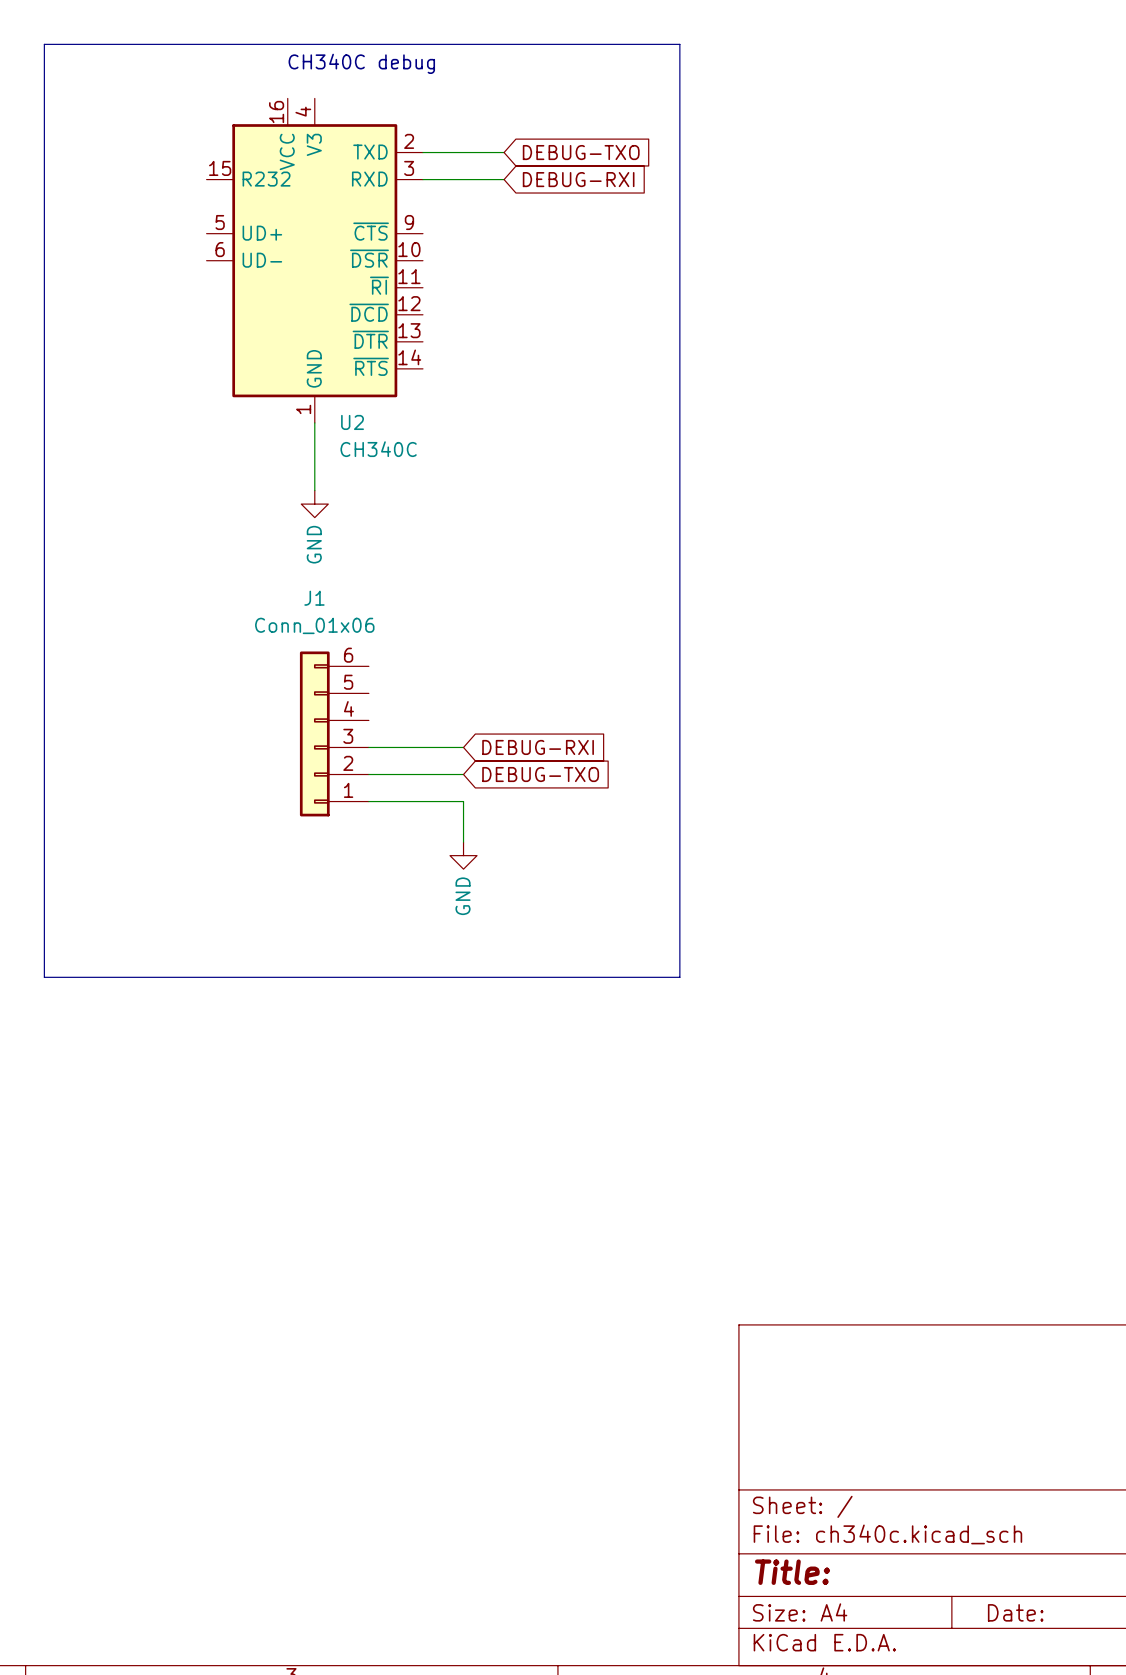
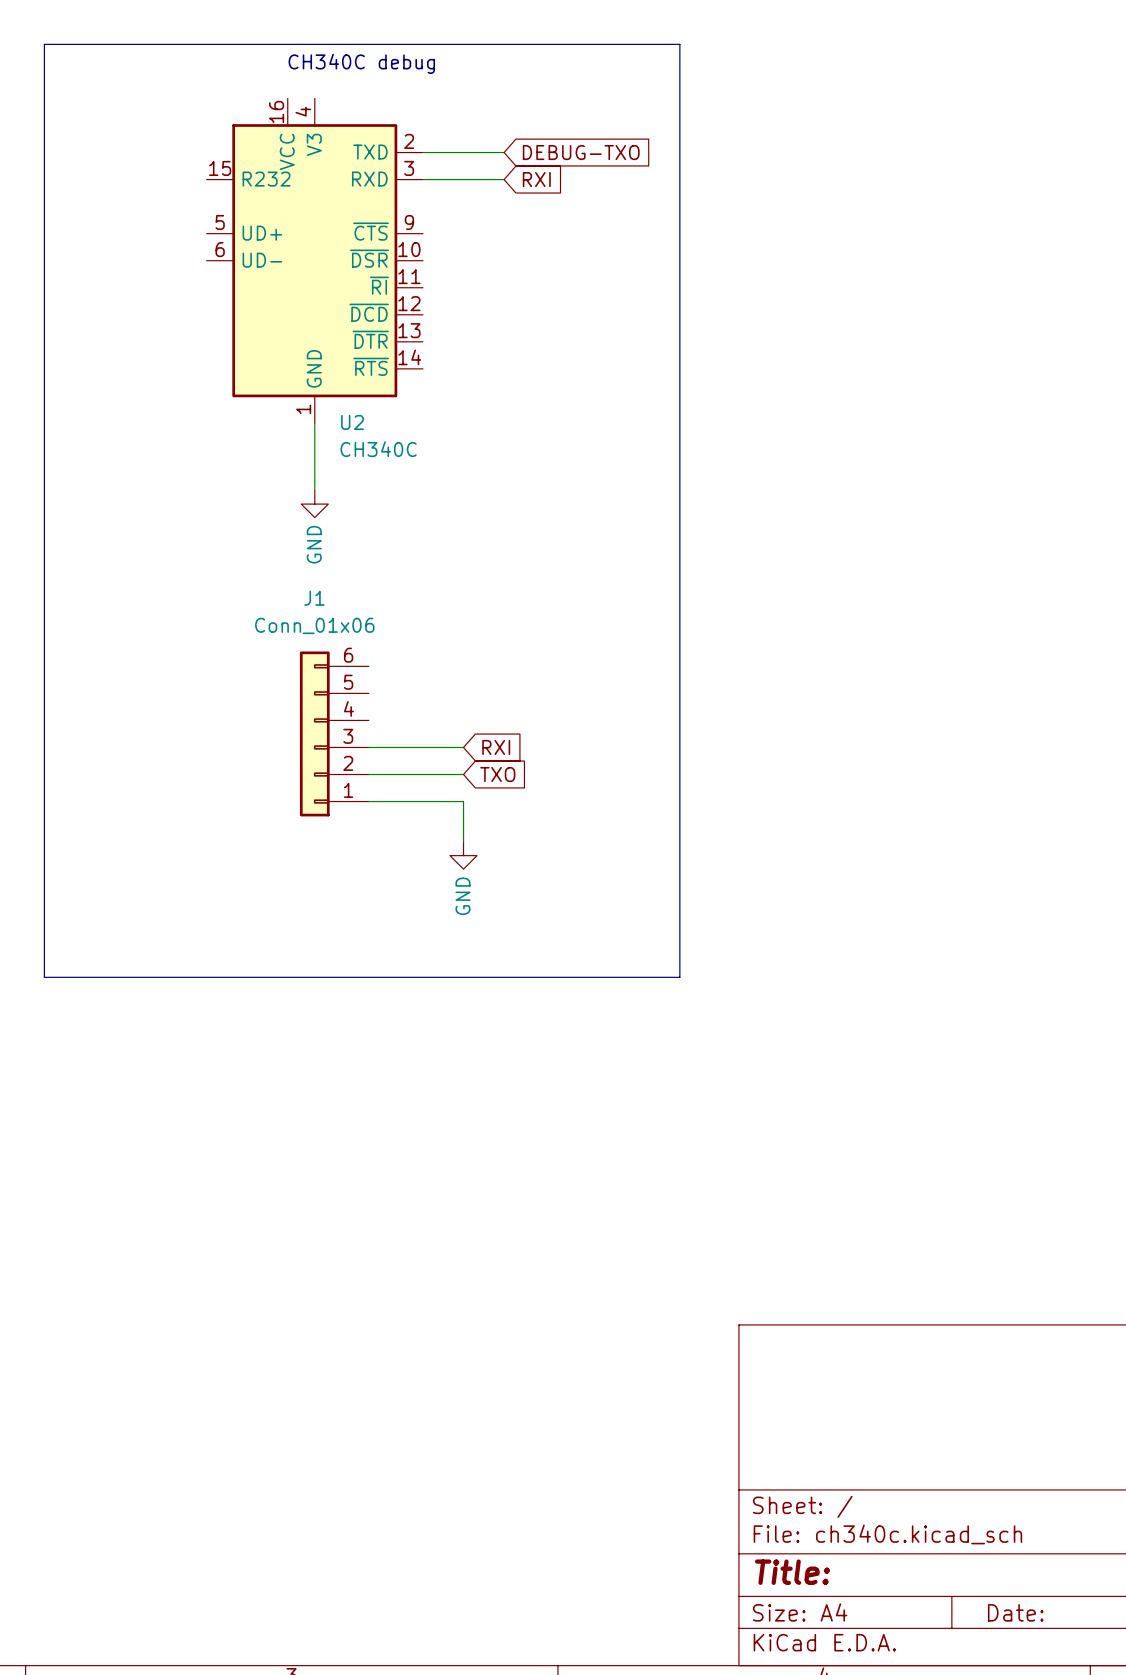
global label: DEBUG-RXI (578, 179) -> RXI (536, 179)
global label: DEBUG-RXI (538, 747) -> RXI (496, 747)
global label: DEBUG-TXO (540, 774) -> TXO (497, 774)

